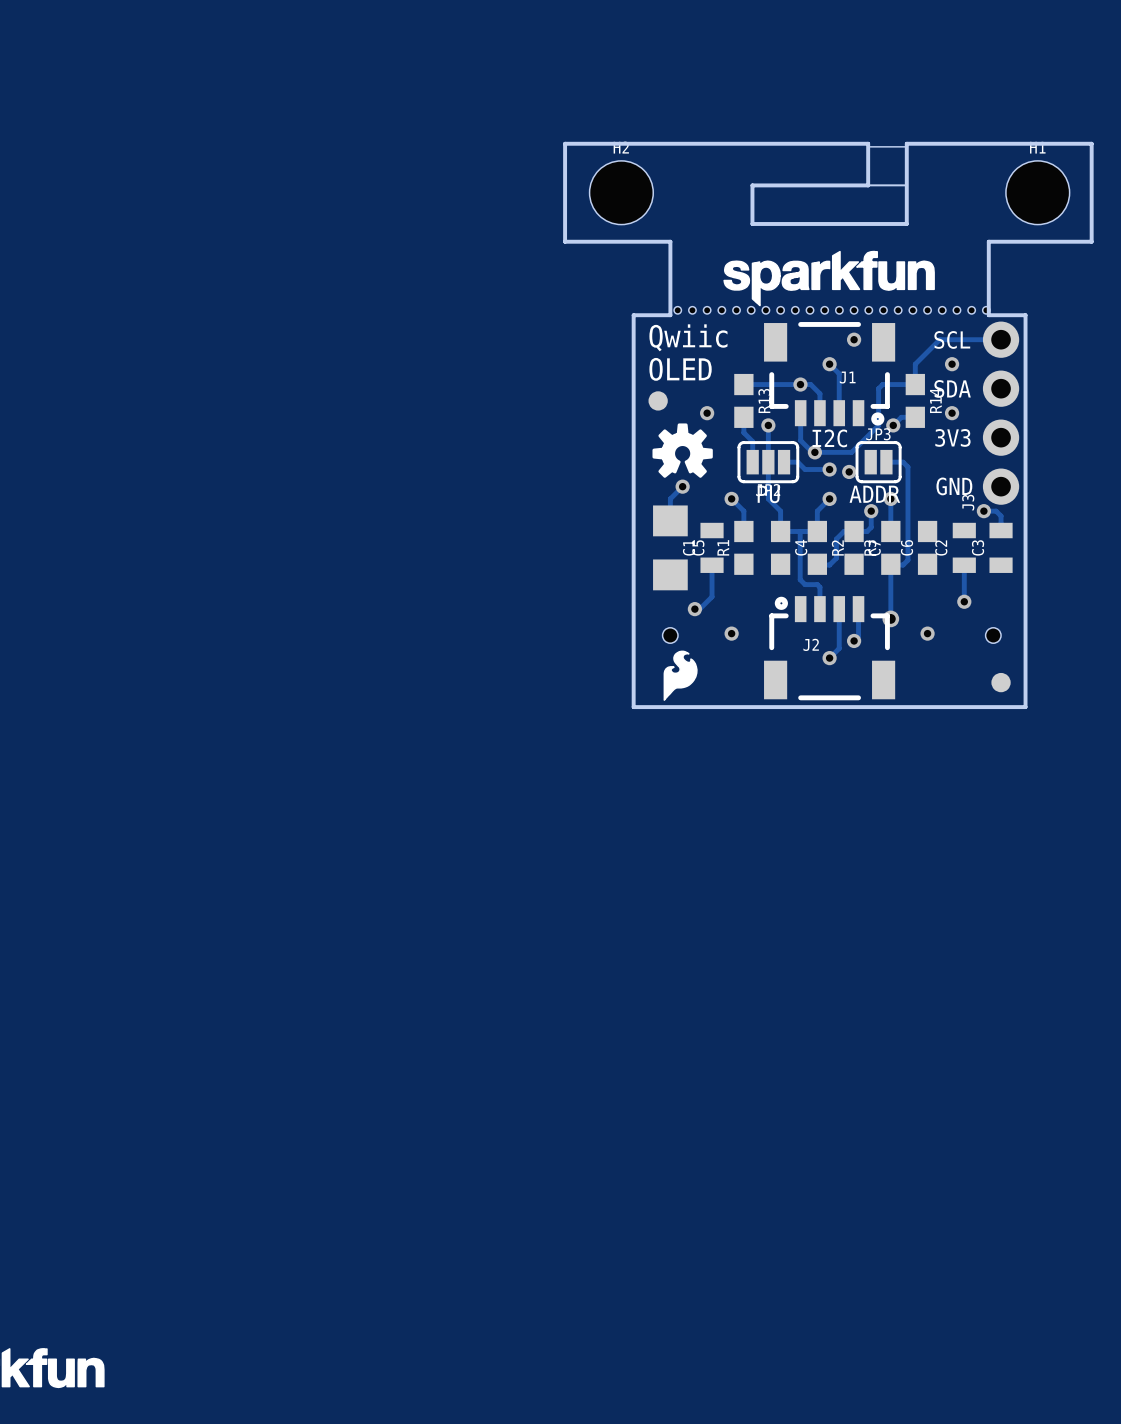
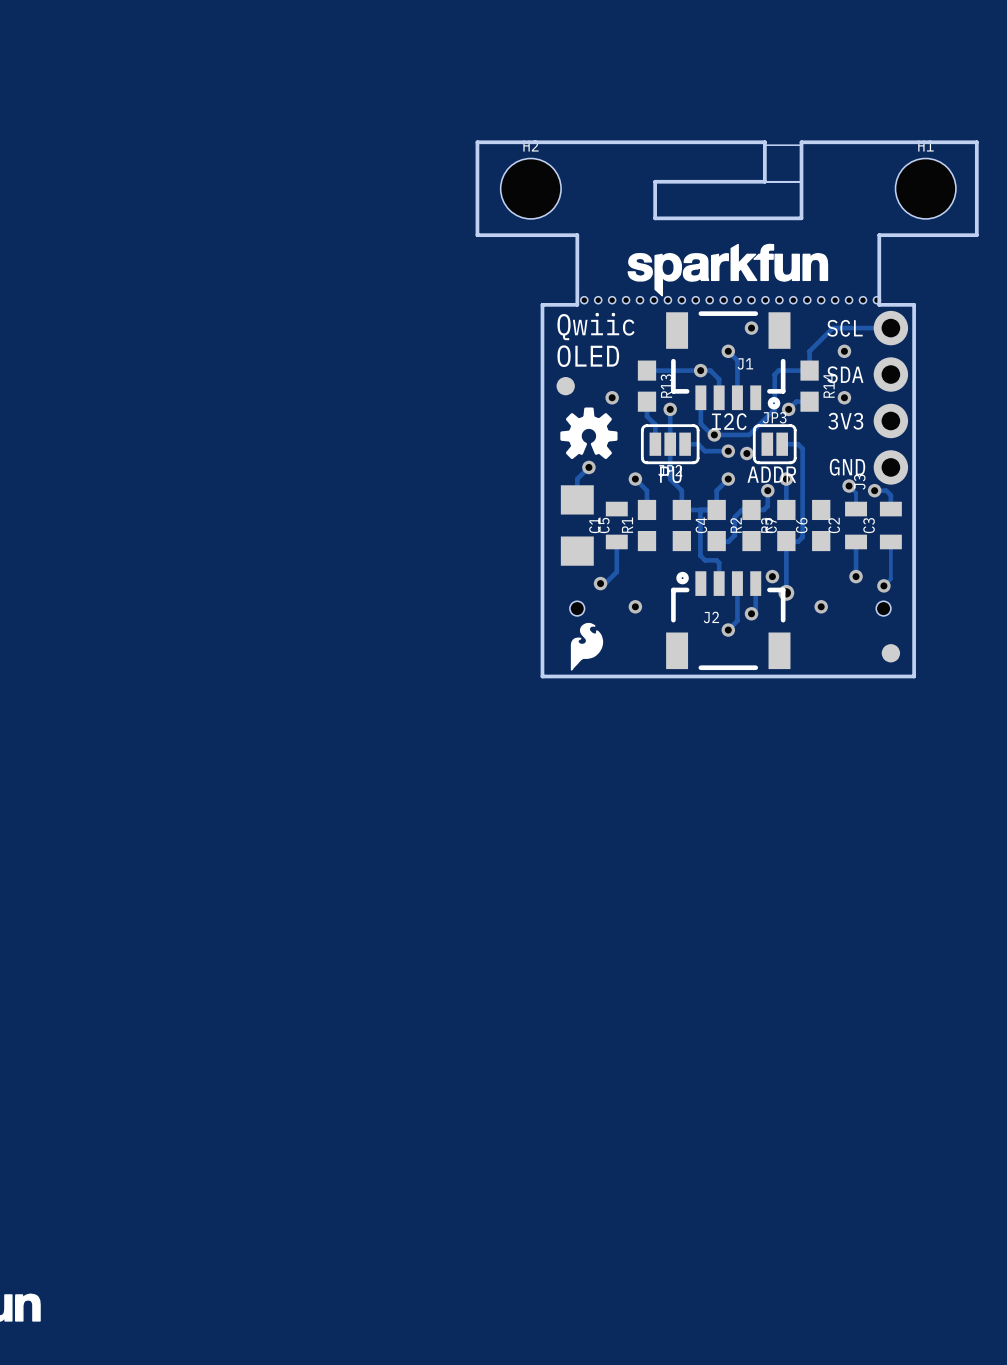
track: none -> (849, 486) (856, 492) (856, 509)
via: none -> (849, 486)
track: none -> (890, 541) (890, 578) (883, 585)
via: none -> (772, 576)
via: none -> (883, 585)

